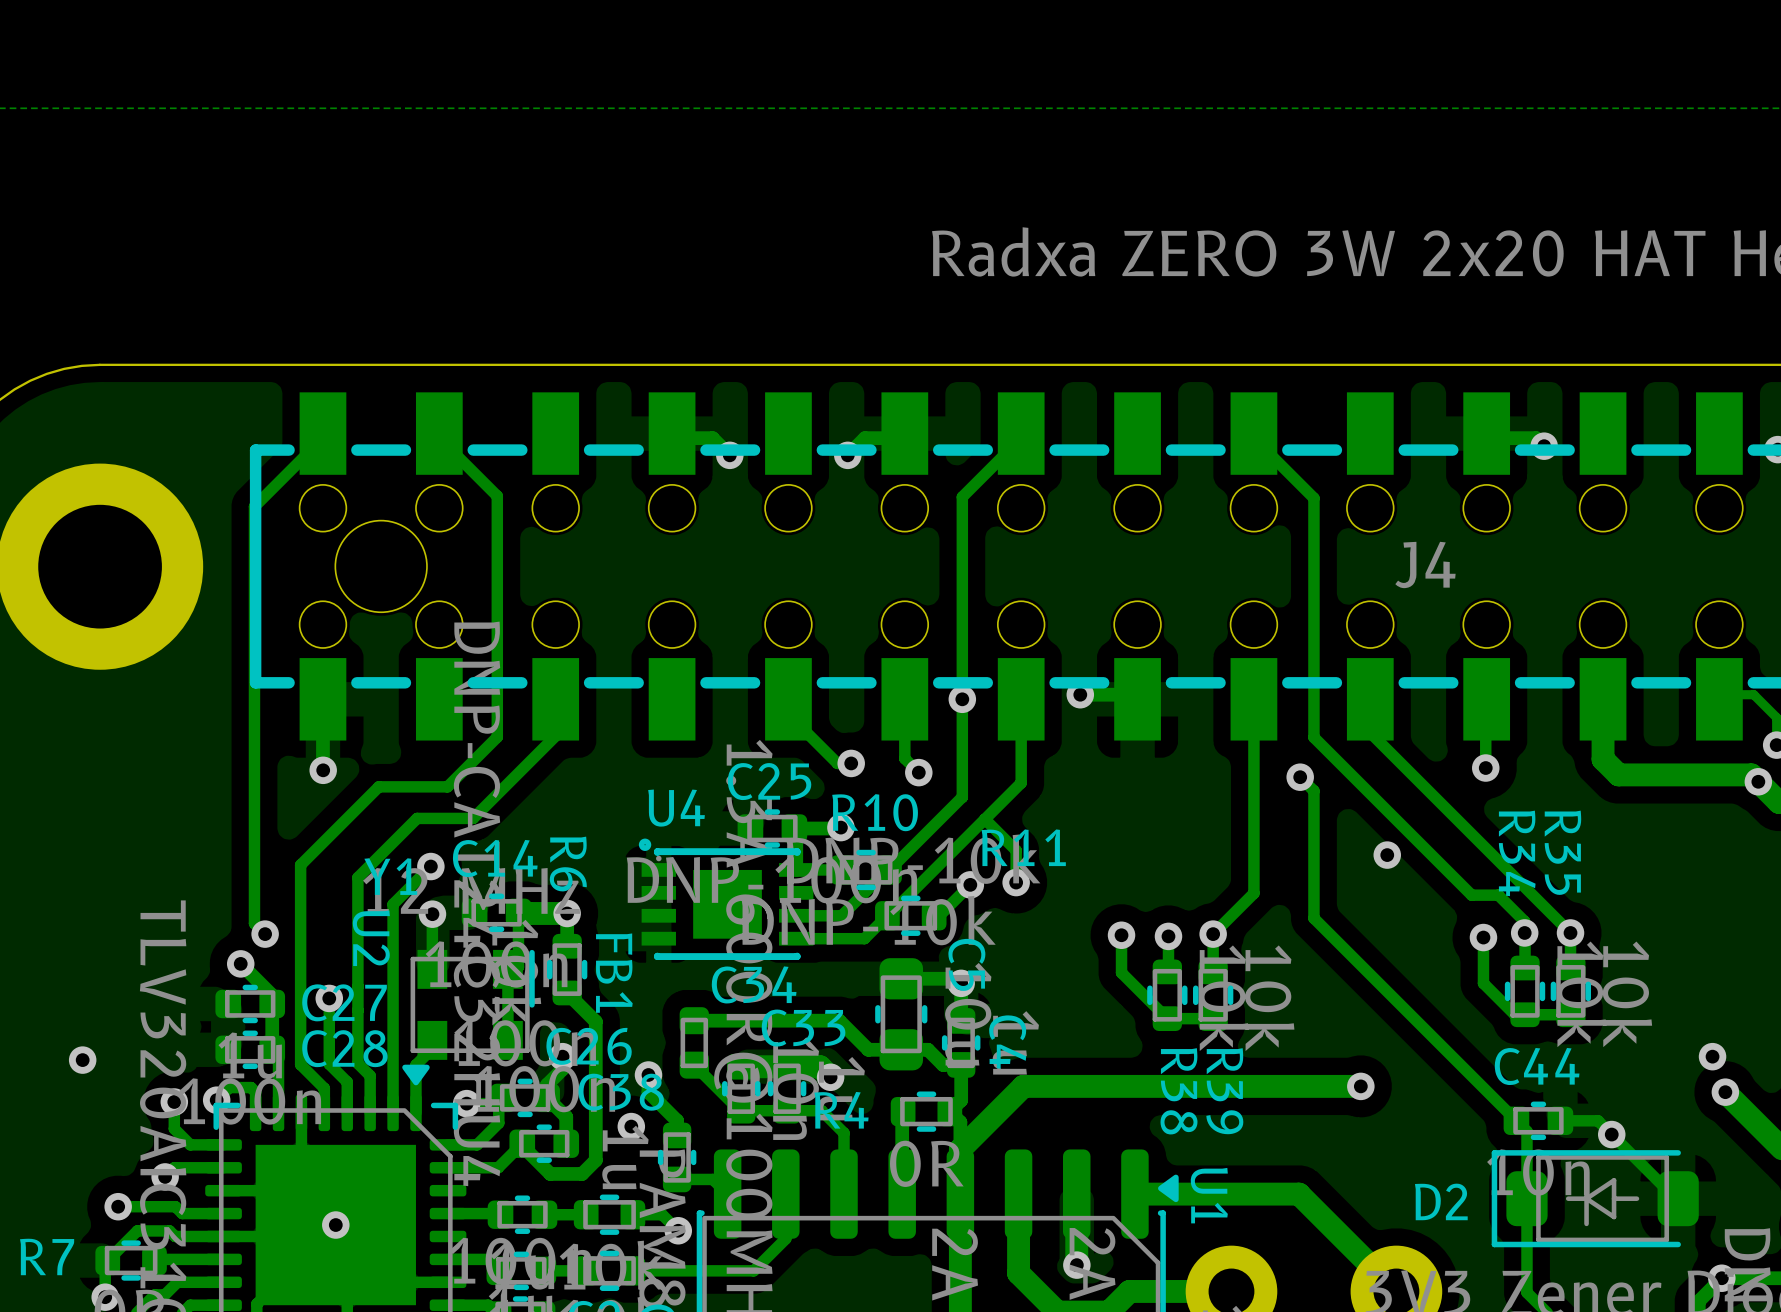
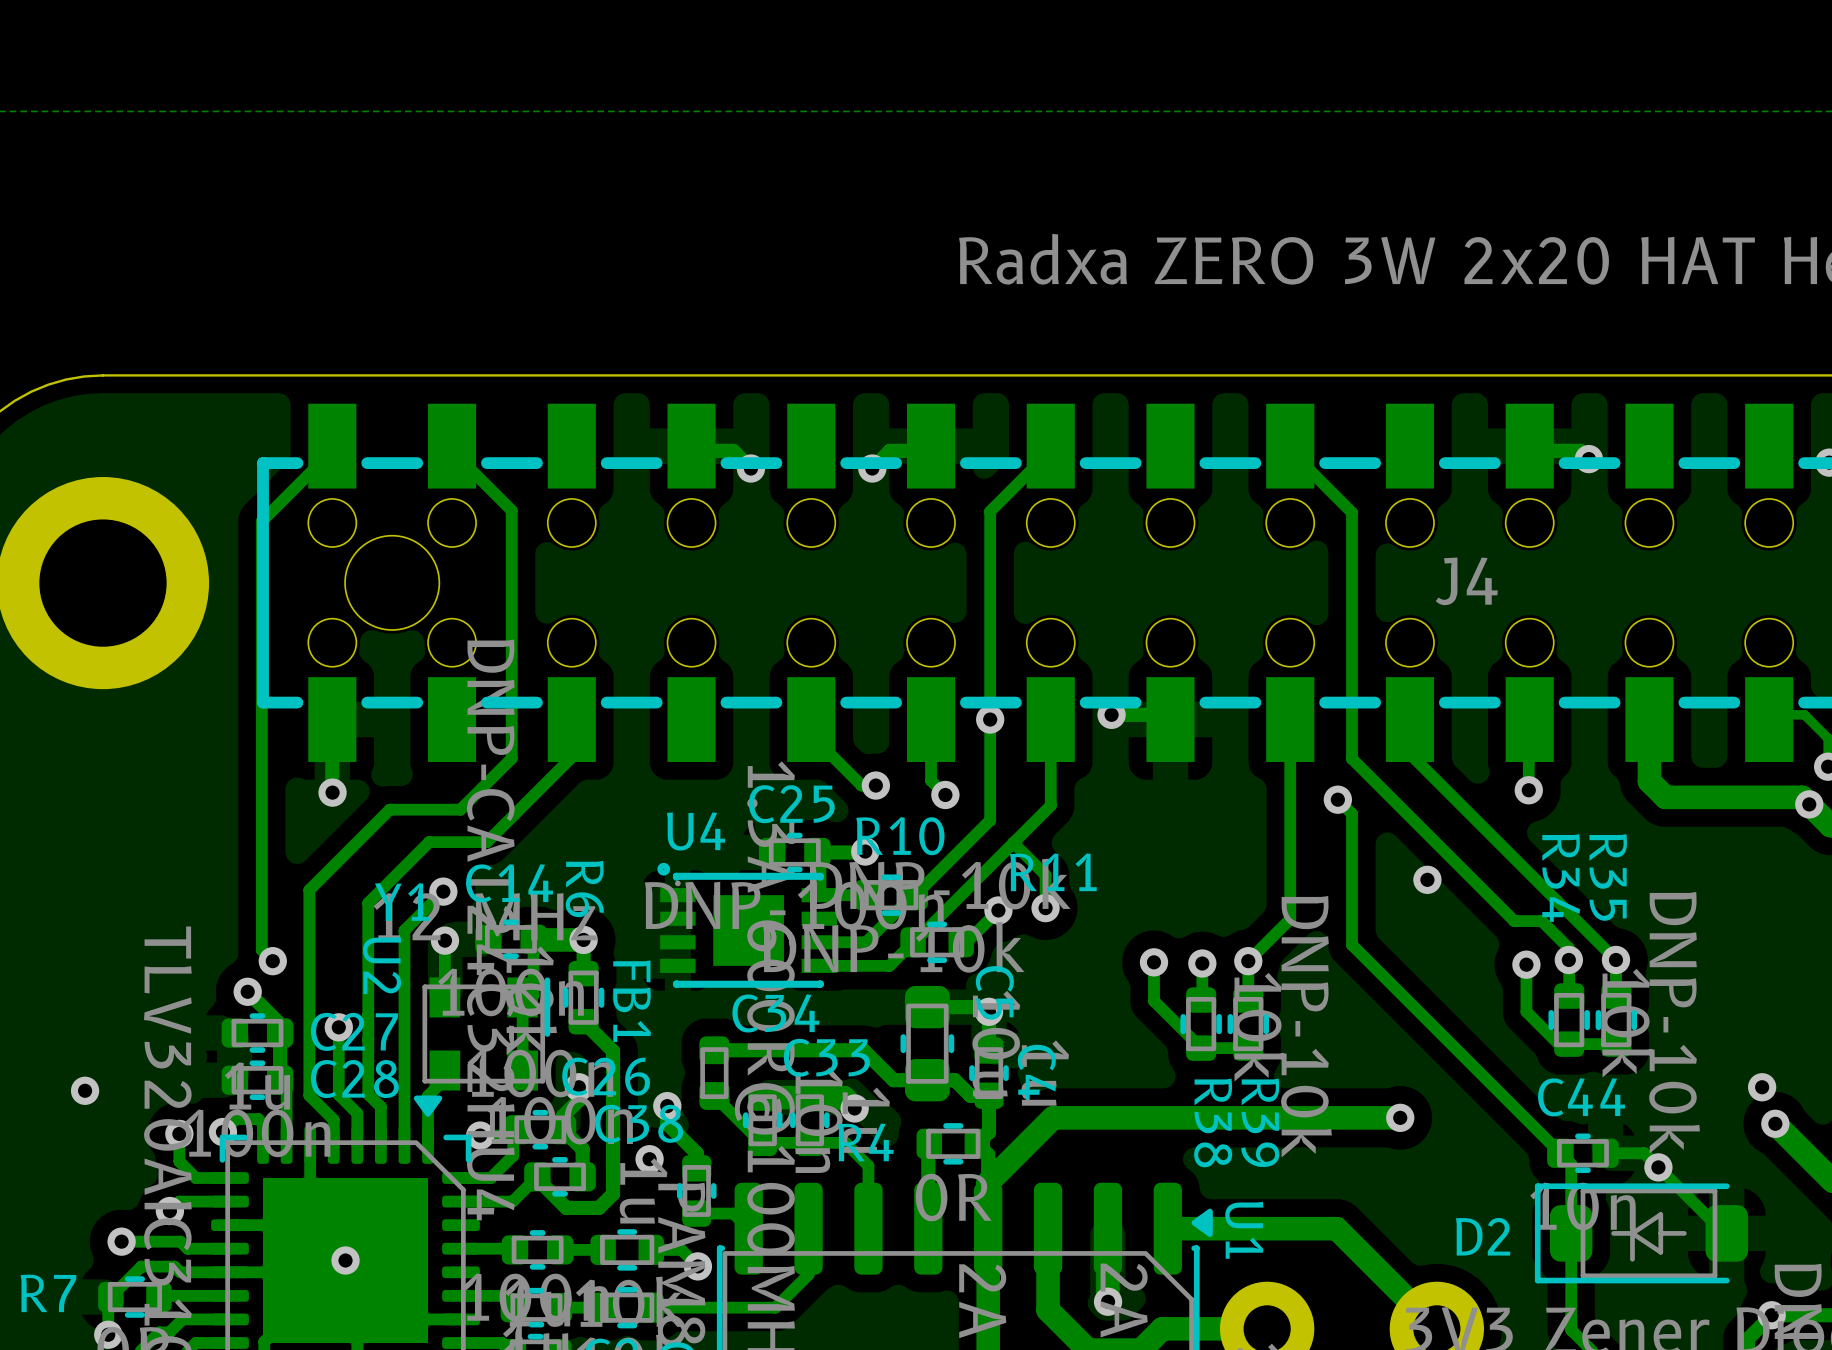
R35 value: 10k (1627, 994) -> DNP-10k (1674, 1022)
R39 value: 10k (1269, 998) -> DNP-10k (1306, 1026)

